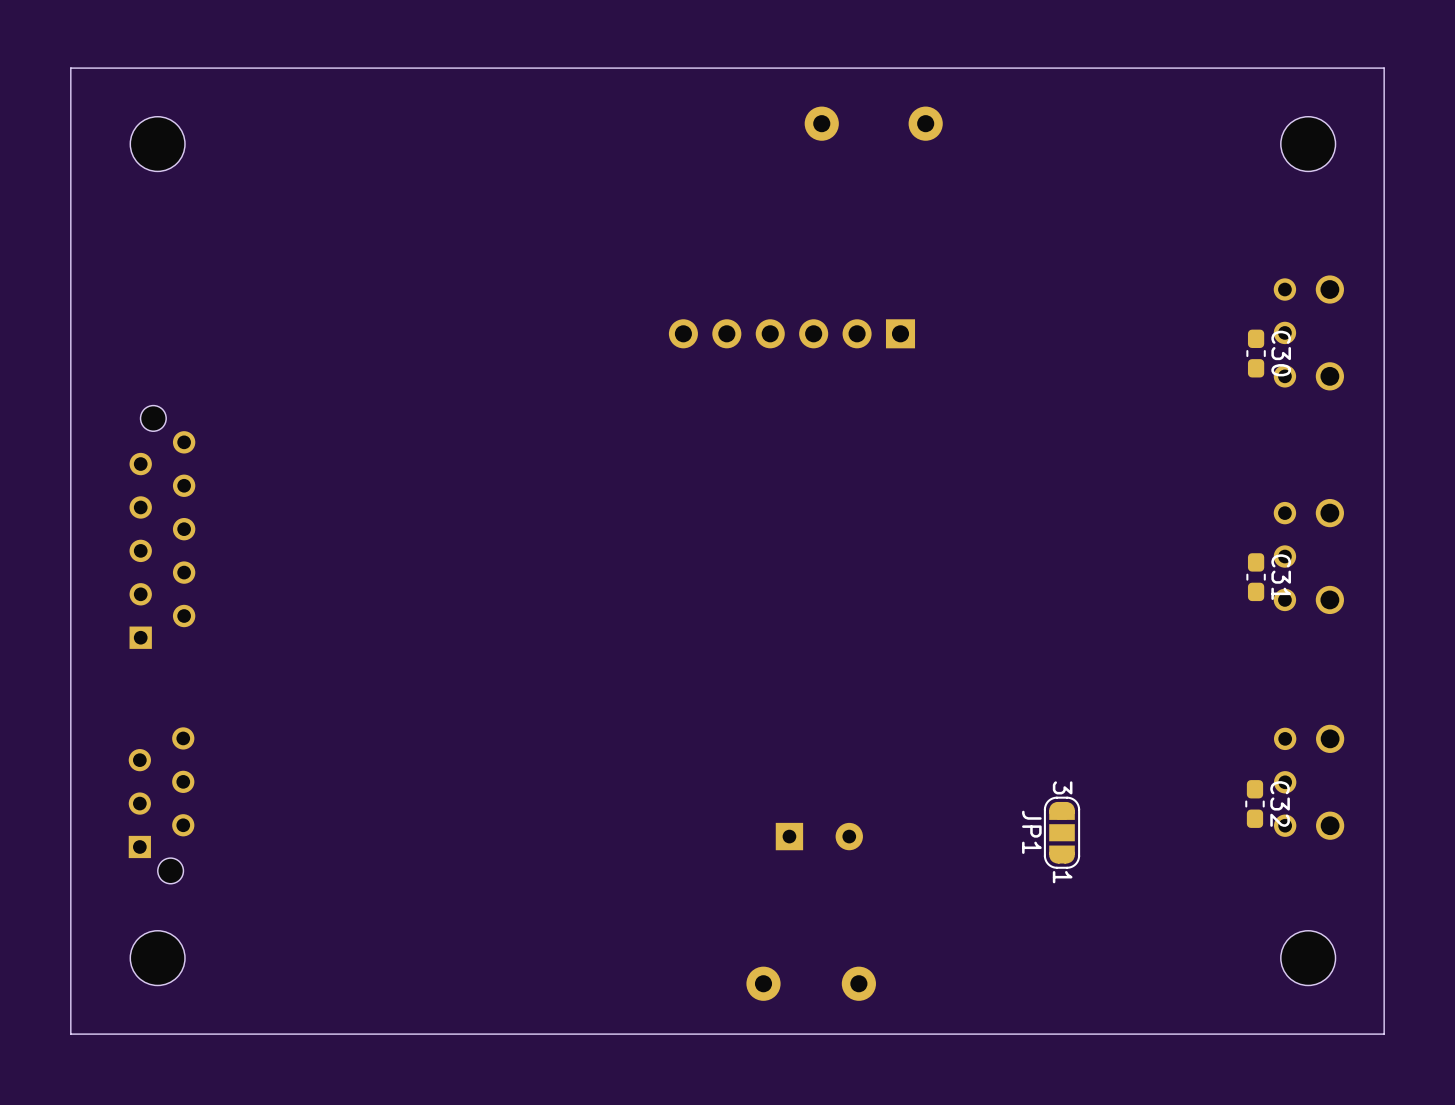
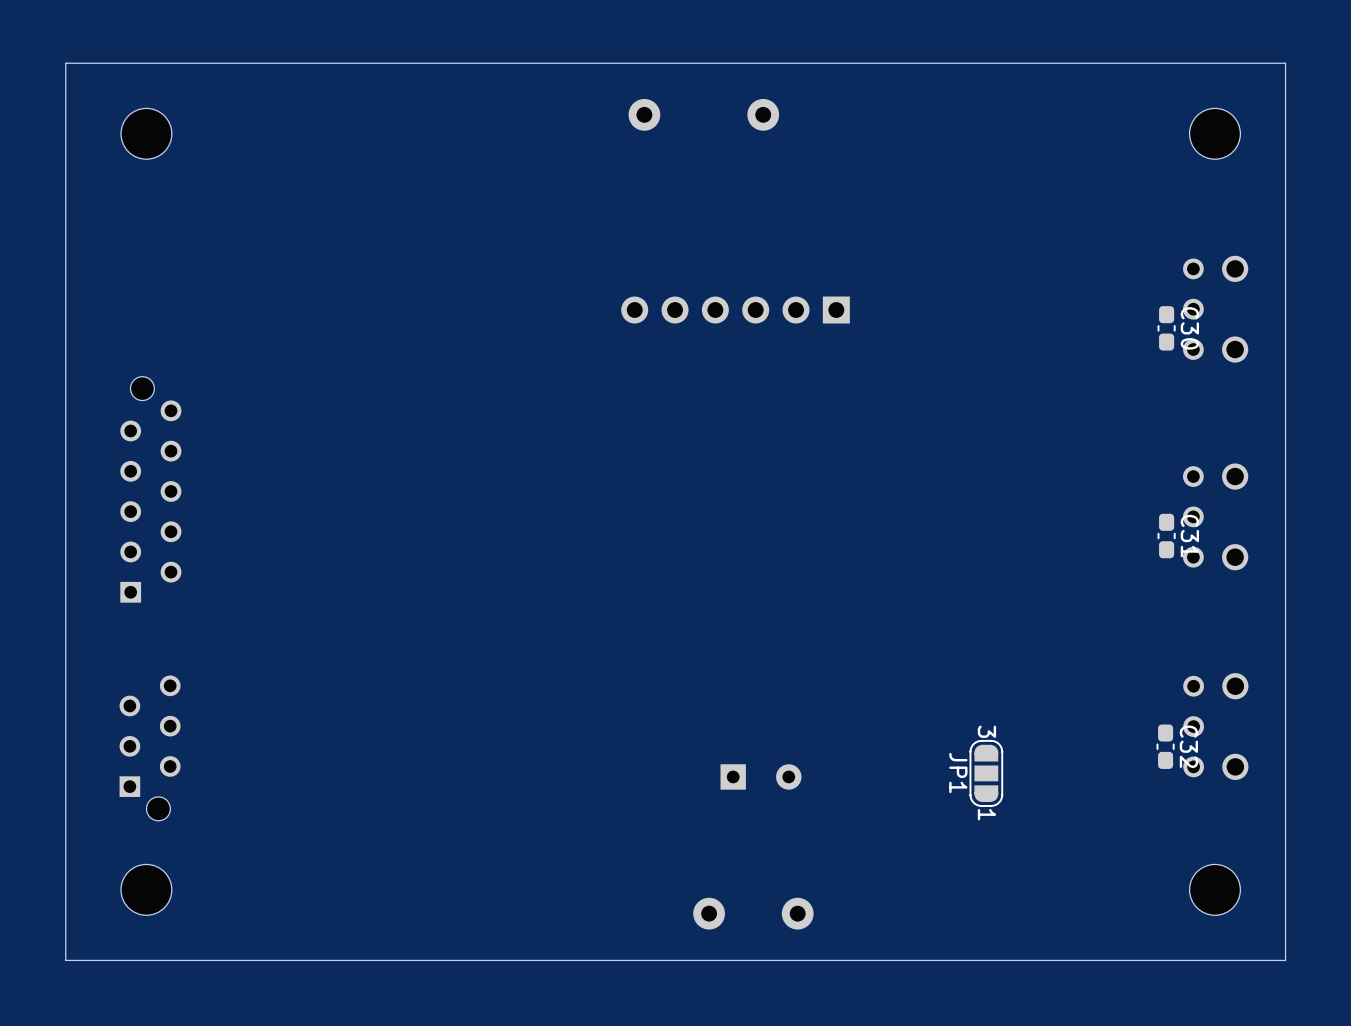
part position: (925, 123) -> (644, 114)

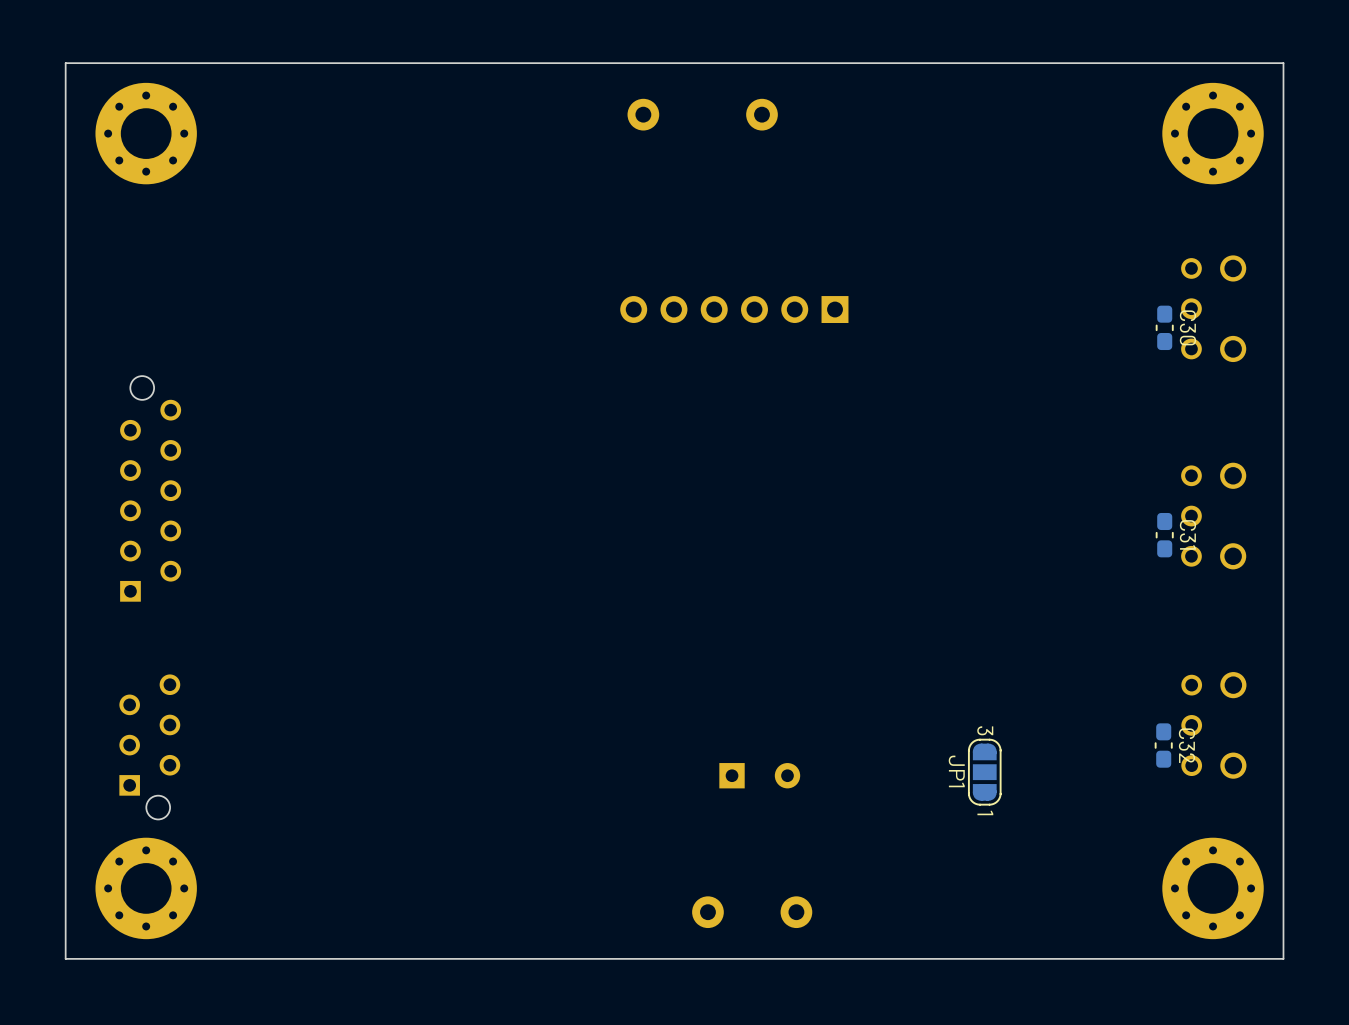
part footprint: [121, 108, 172, 160] -> [95, 82, 197, 185]
part footprint: [1189, 108, 1241, 160] -> [1162, 82, 1264, 185]
part footprint: [121, 864, 172, 916] -> [95, 837, 197, 940]
part footprint: [1189, 864, 1241, 916] -> [1162, 837, 1264, 940]

